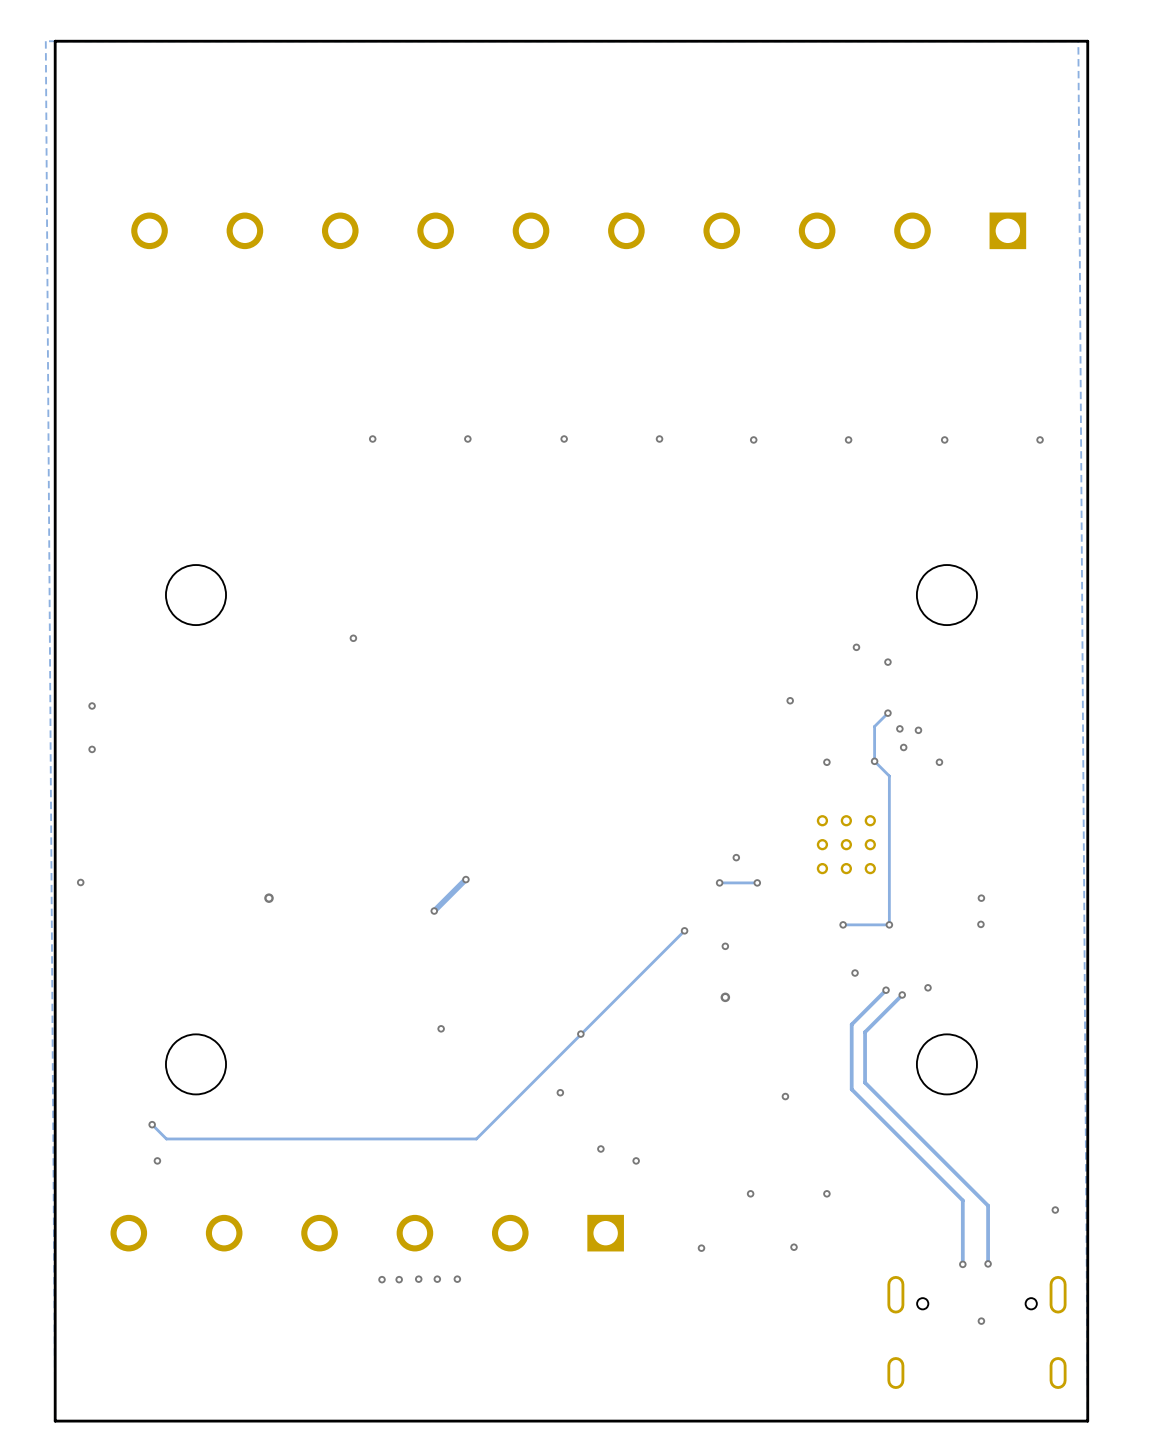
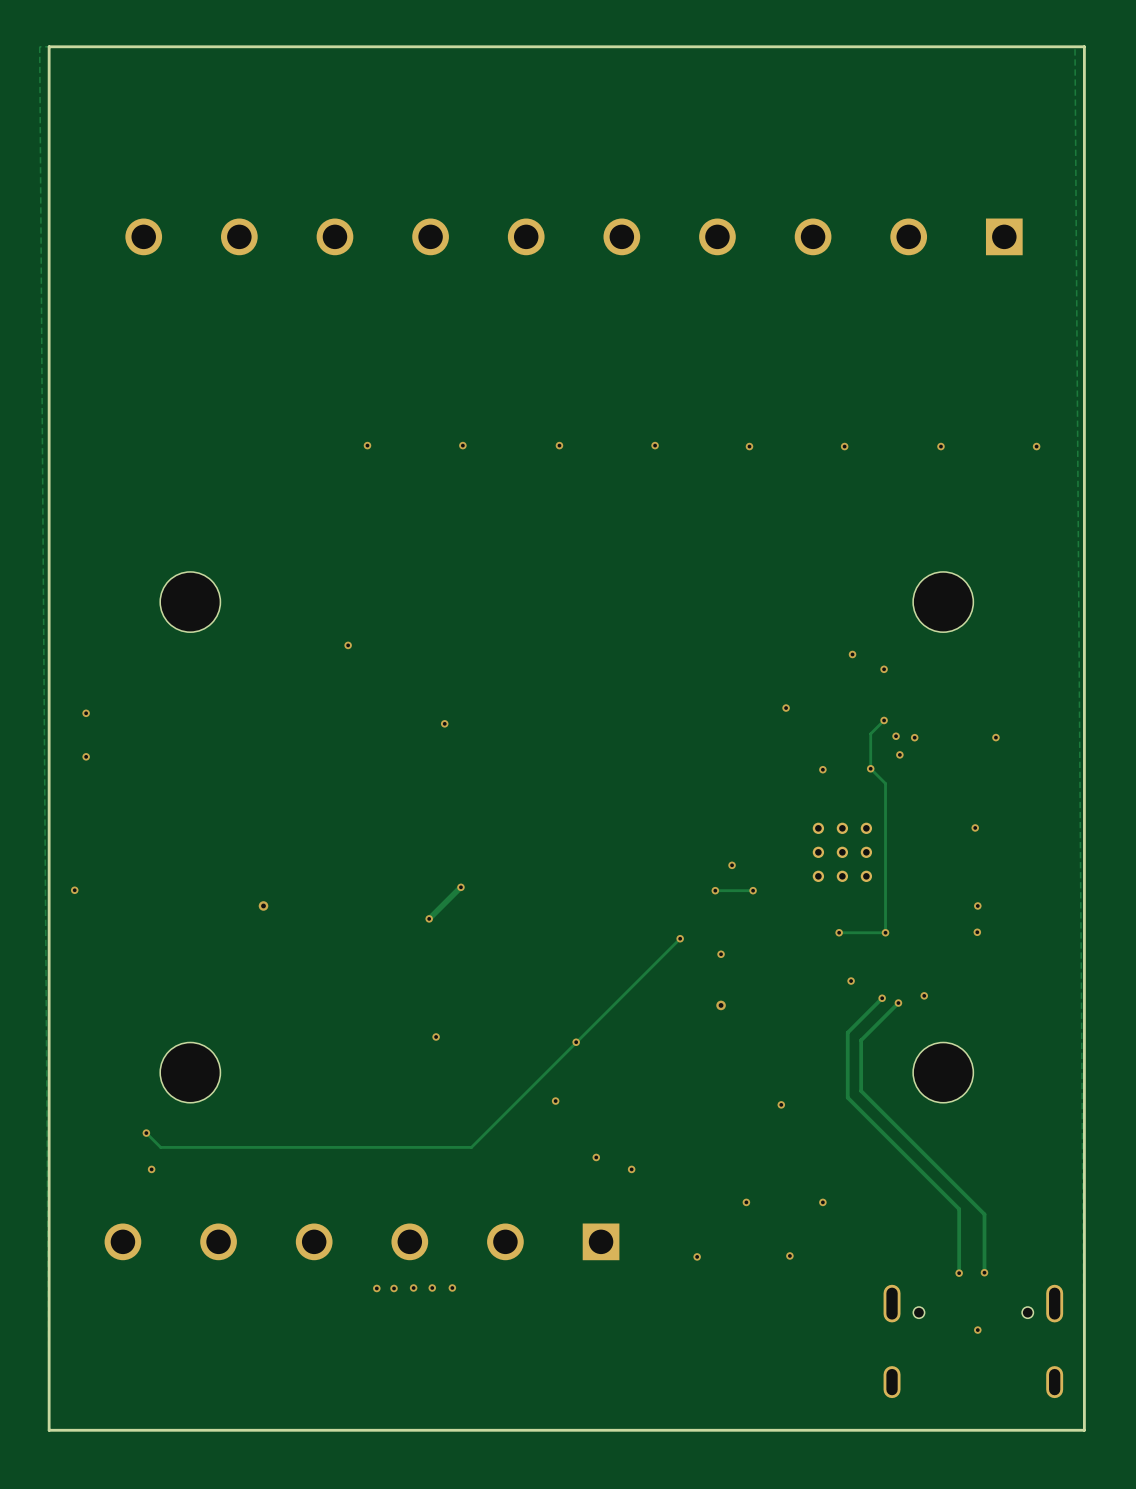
via: none -> (444, 723)
via: none -> (995, 737)
via: (939, 762) -> none
via: none -> (975, 827)
via: (1055, 1210) -> none

